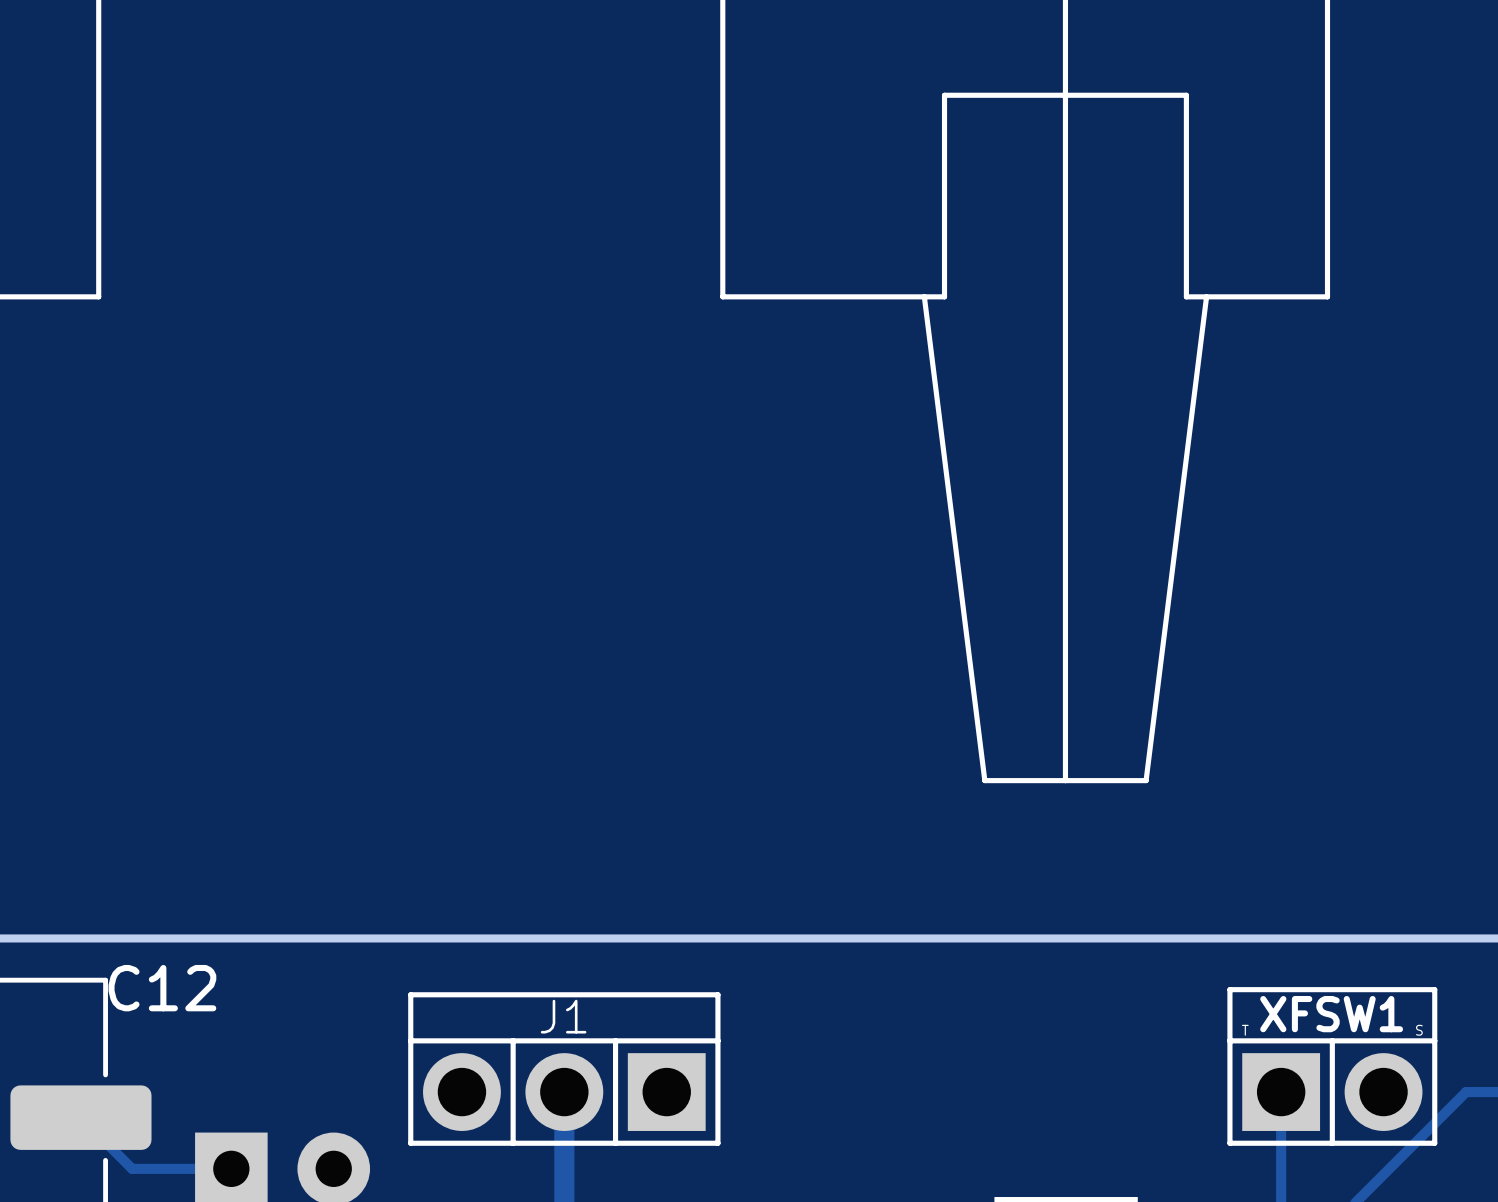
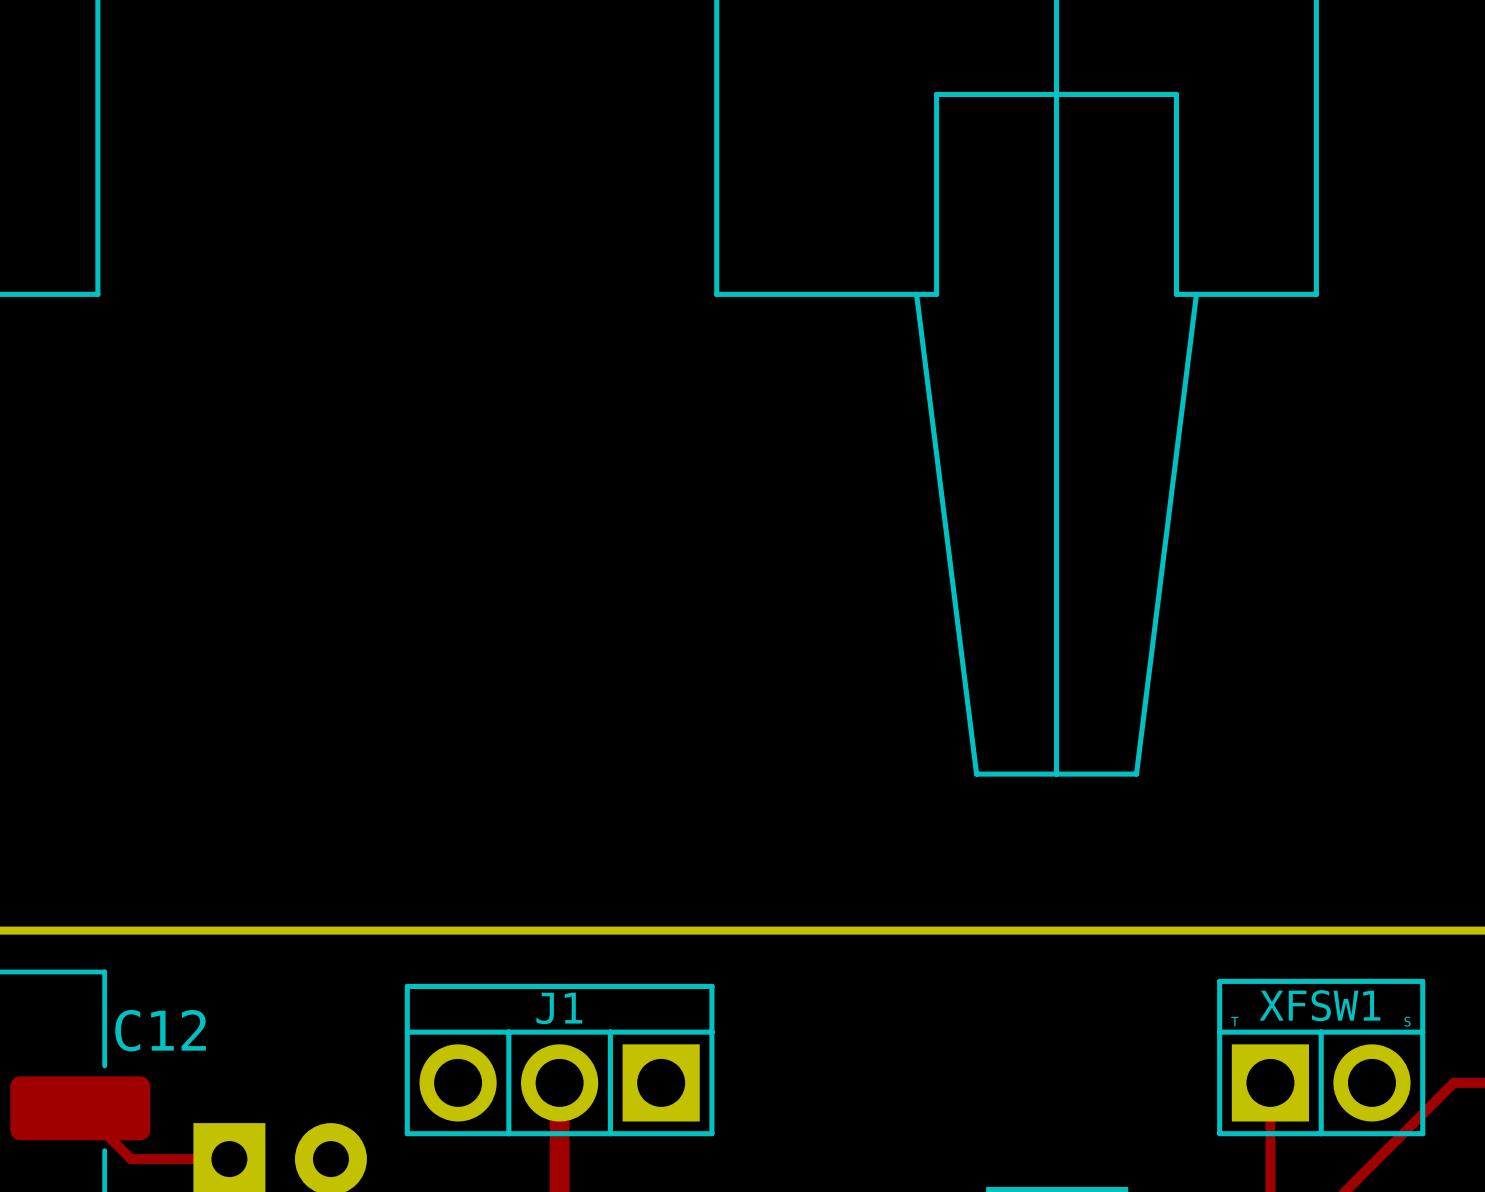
C12 name position: C12 (162, 988) -> C12 (160, 1030)

